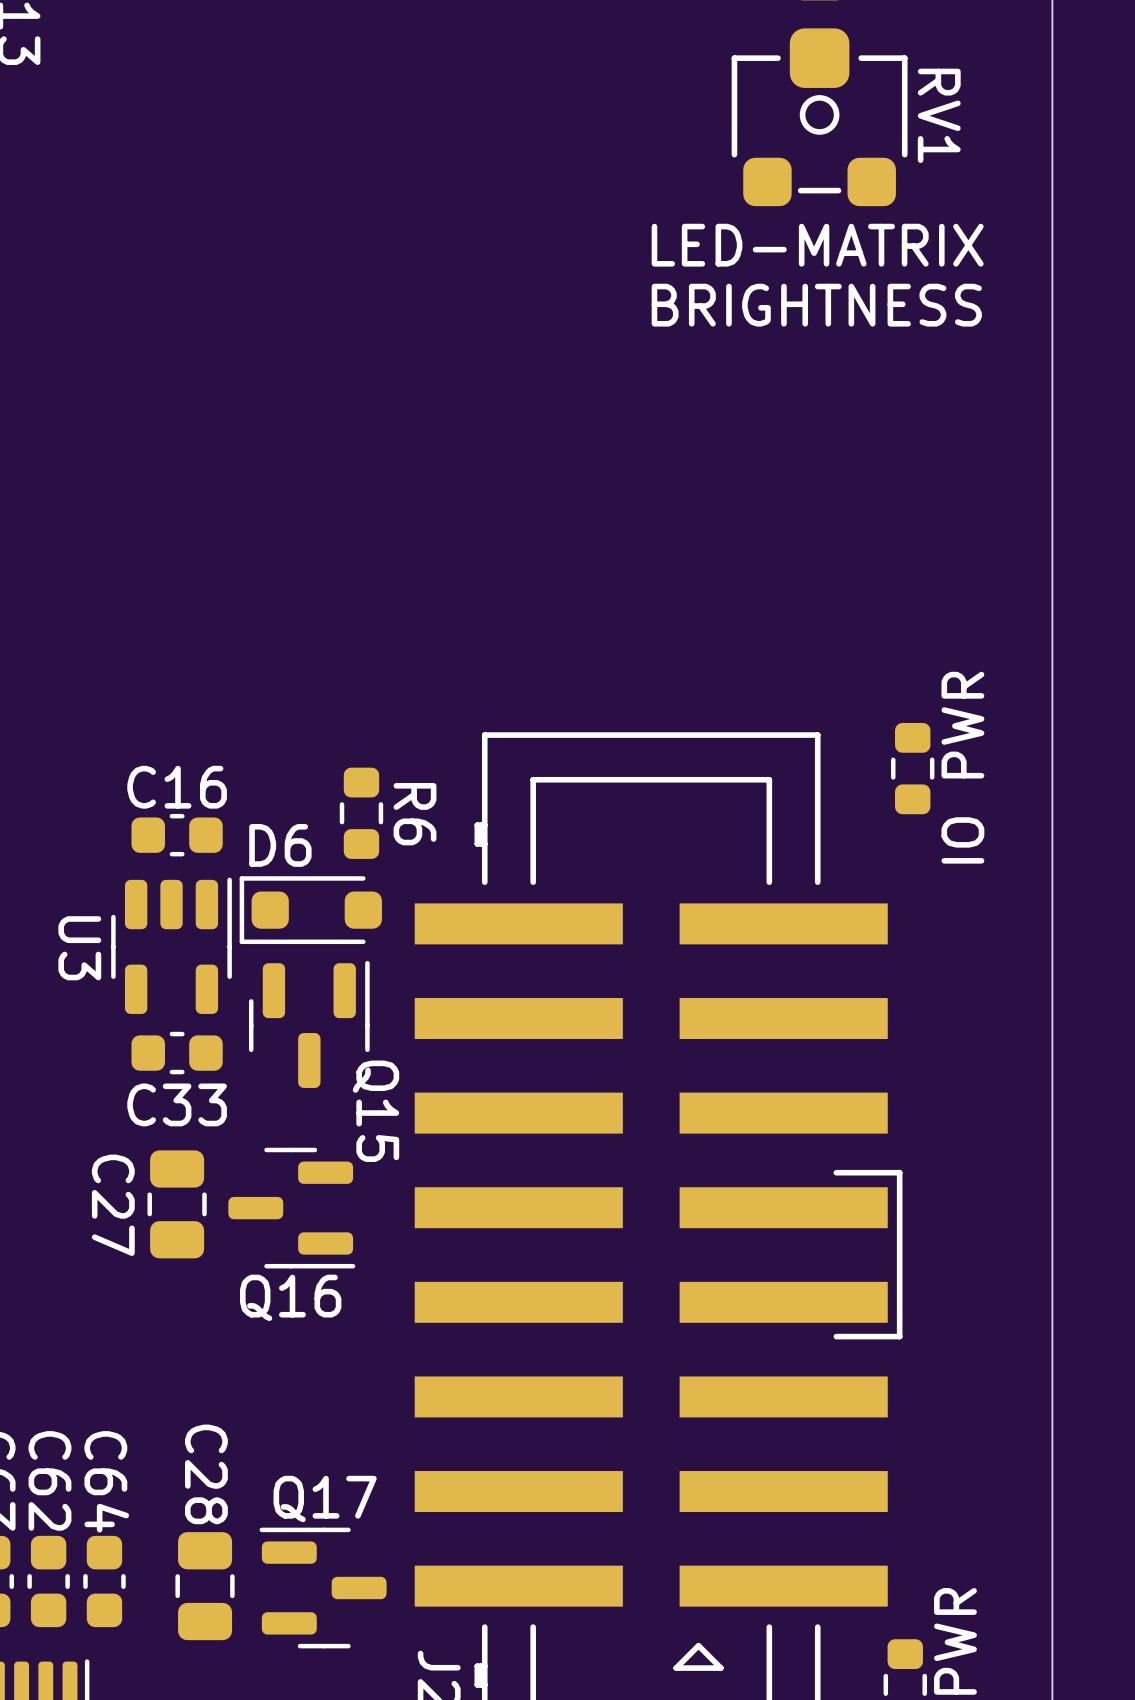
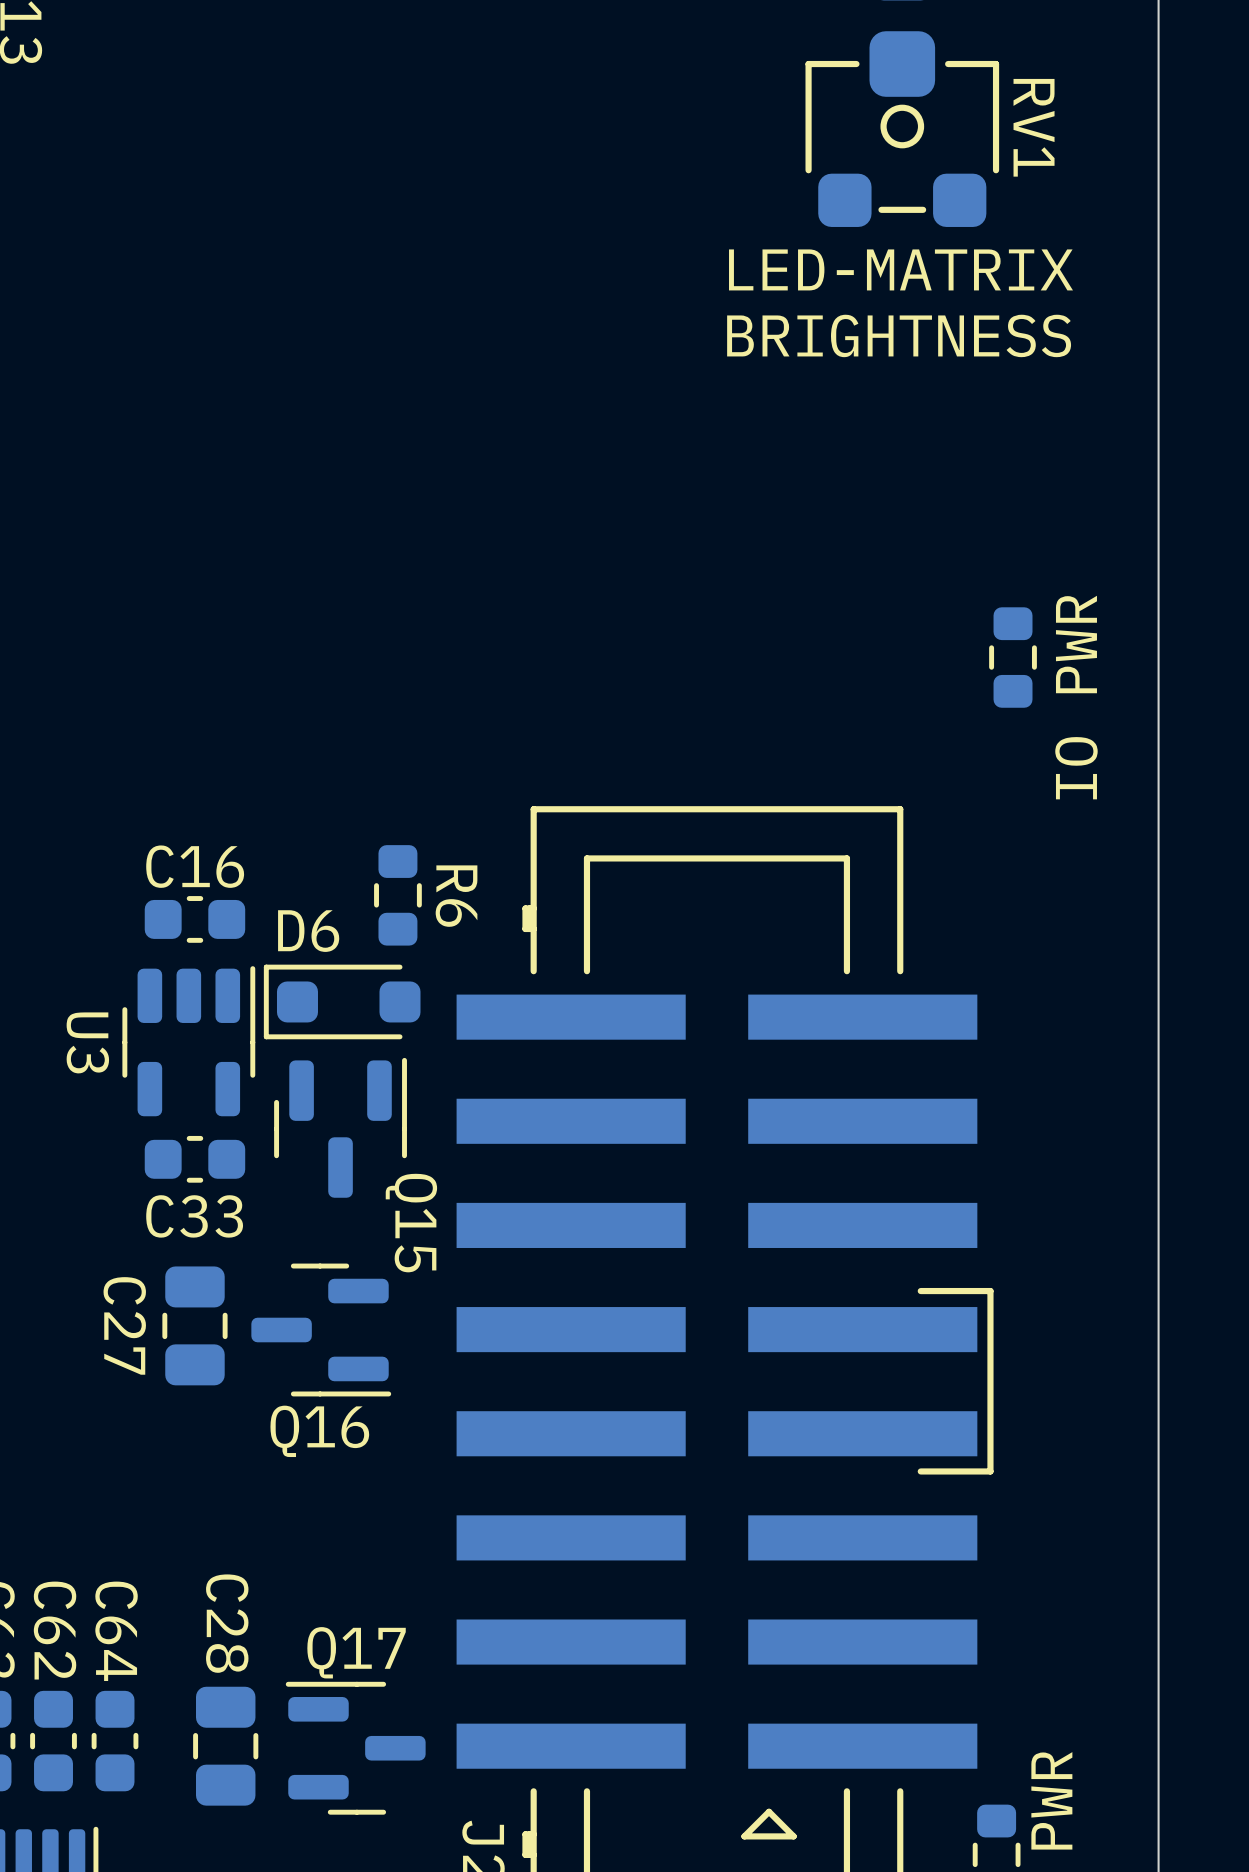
text position: IO PWR (962, 767) -> IO PWR (1076, 697)
part position: (912, 768) -> (1013, 657)

